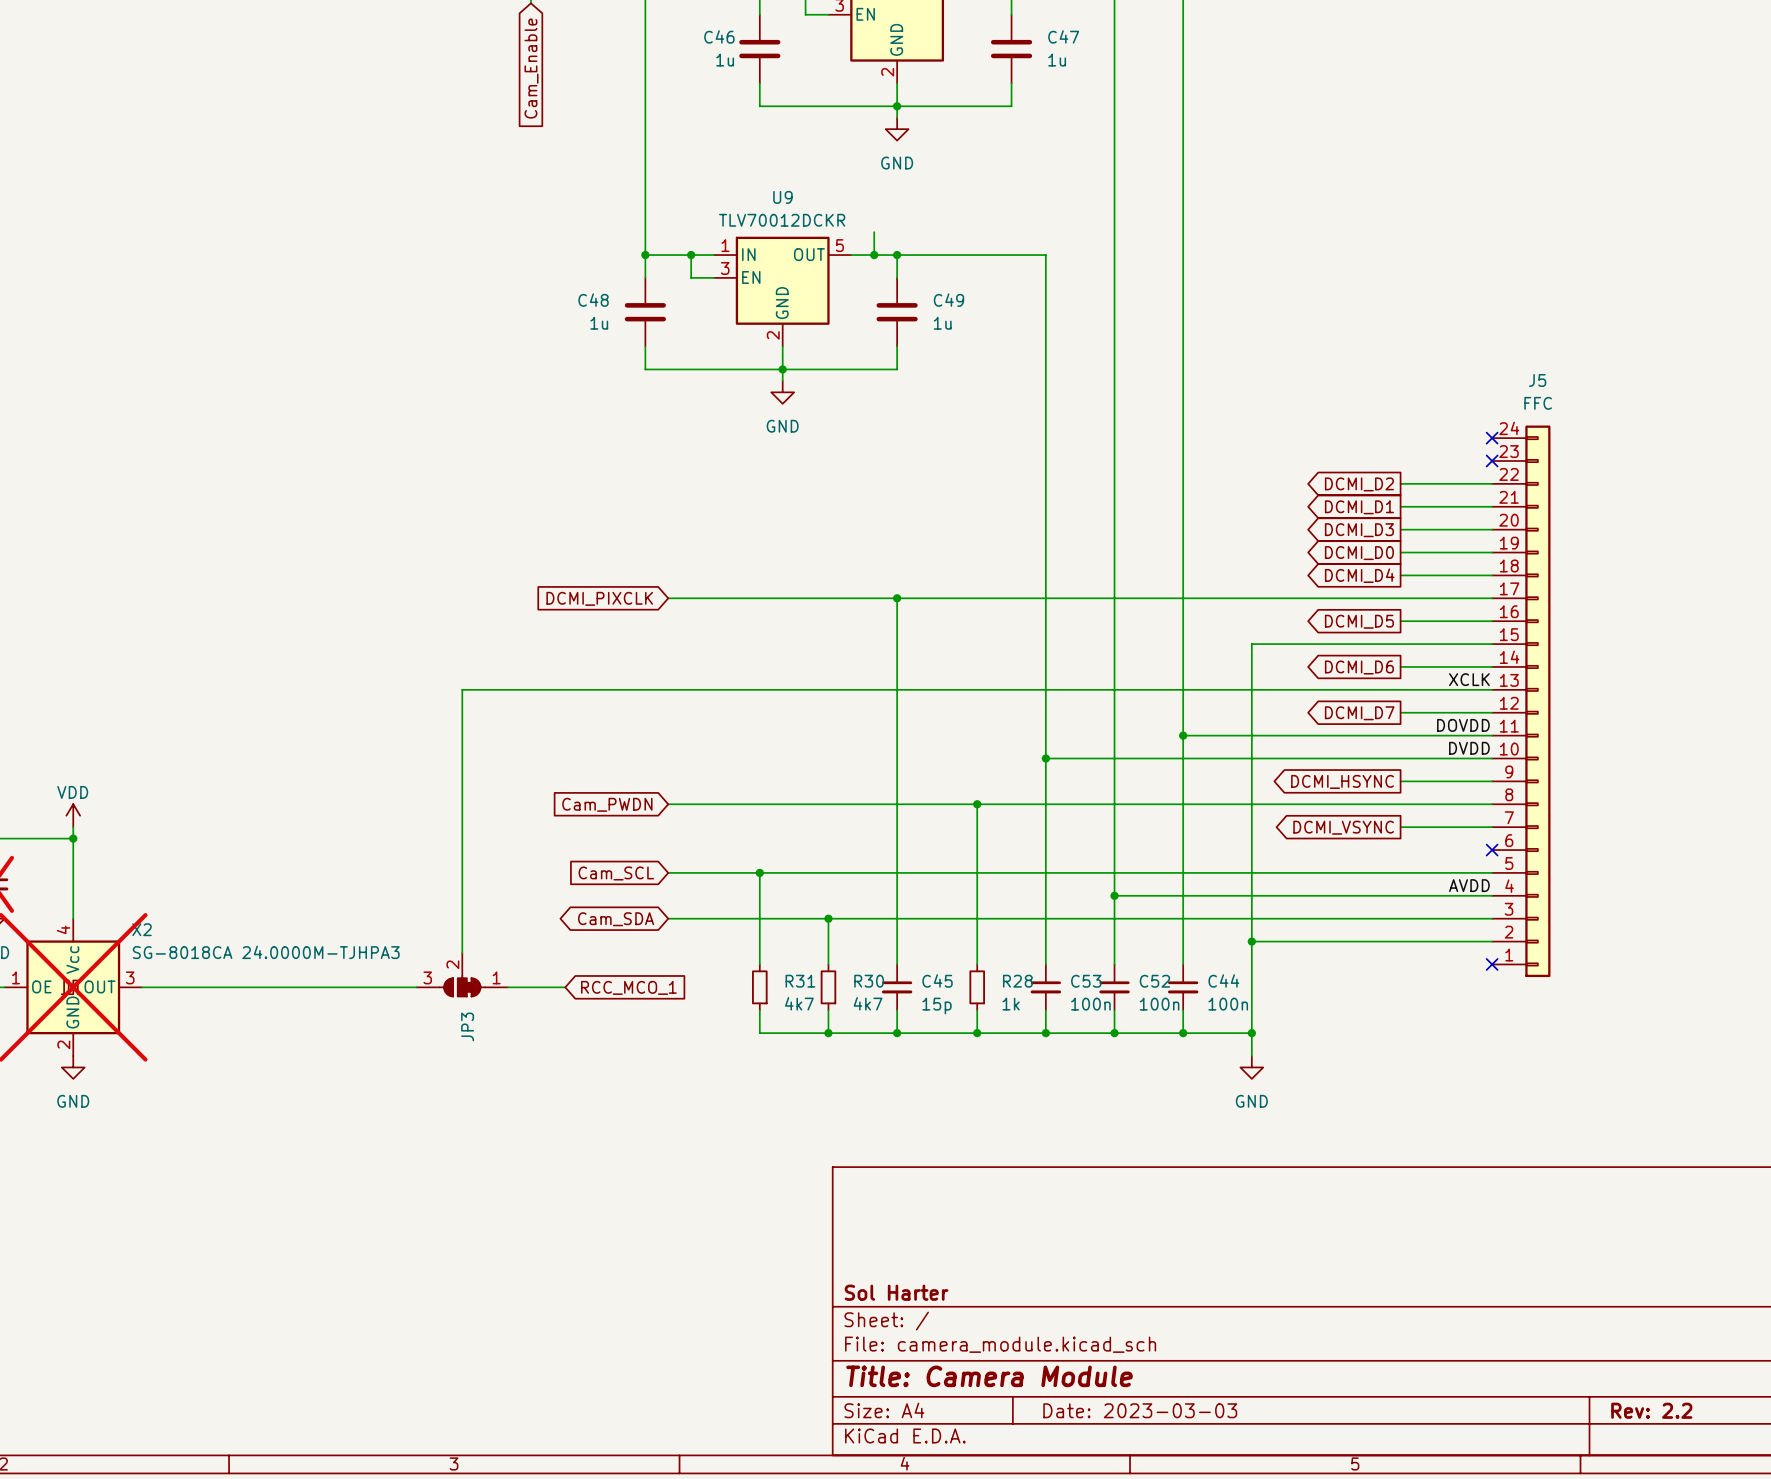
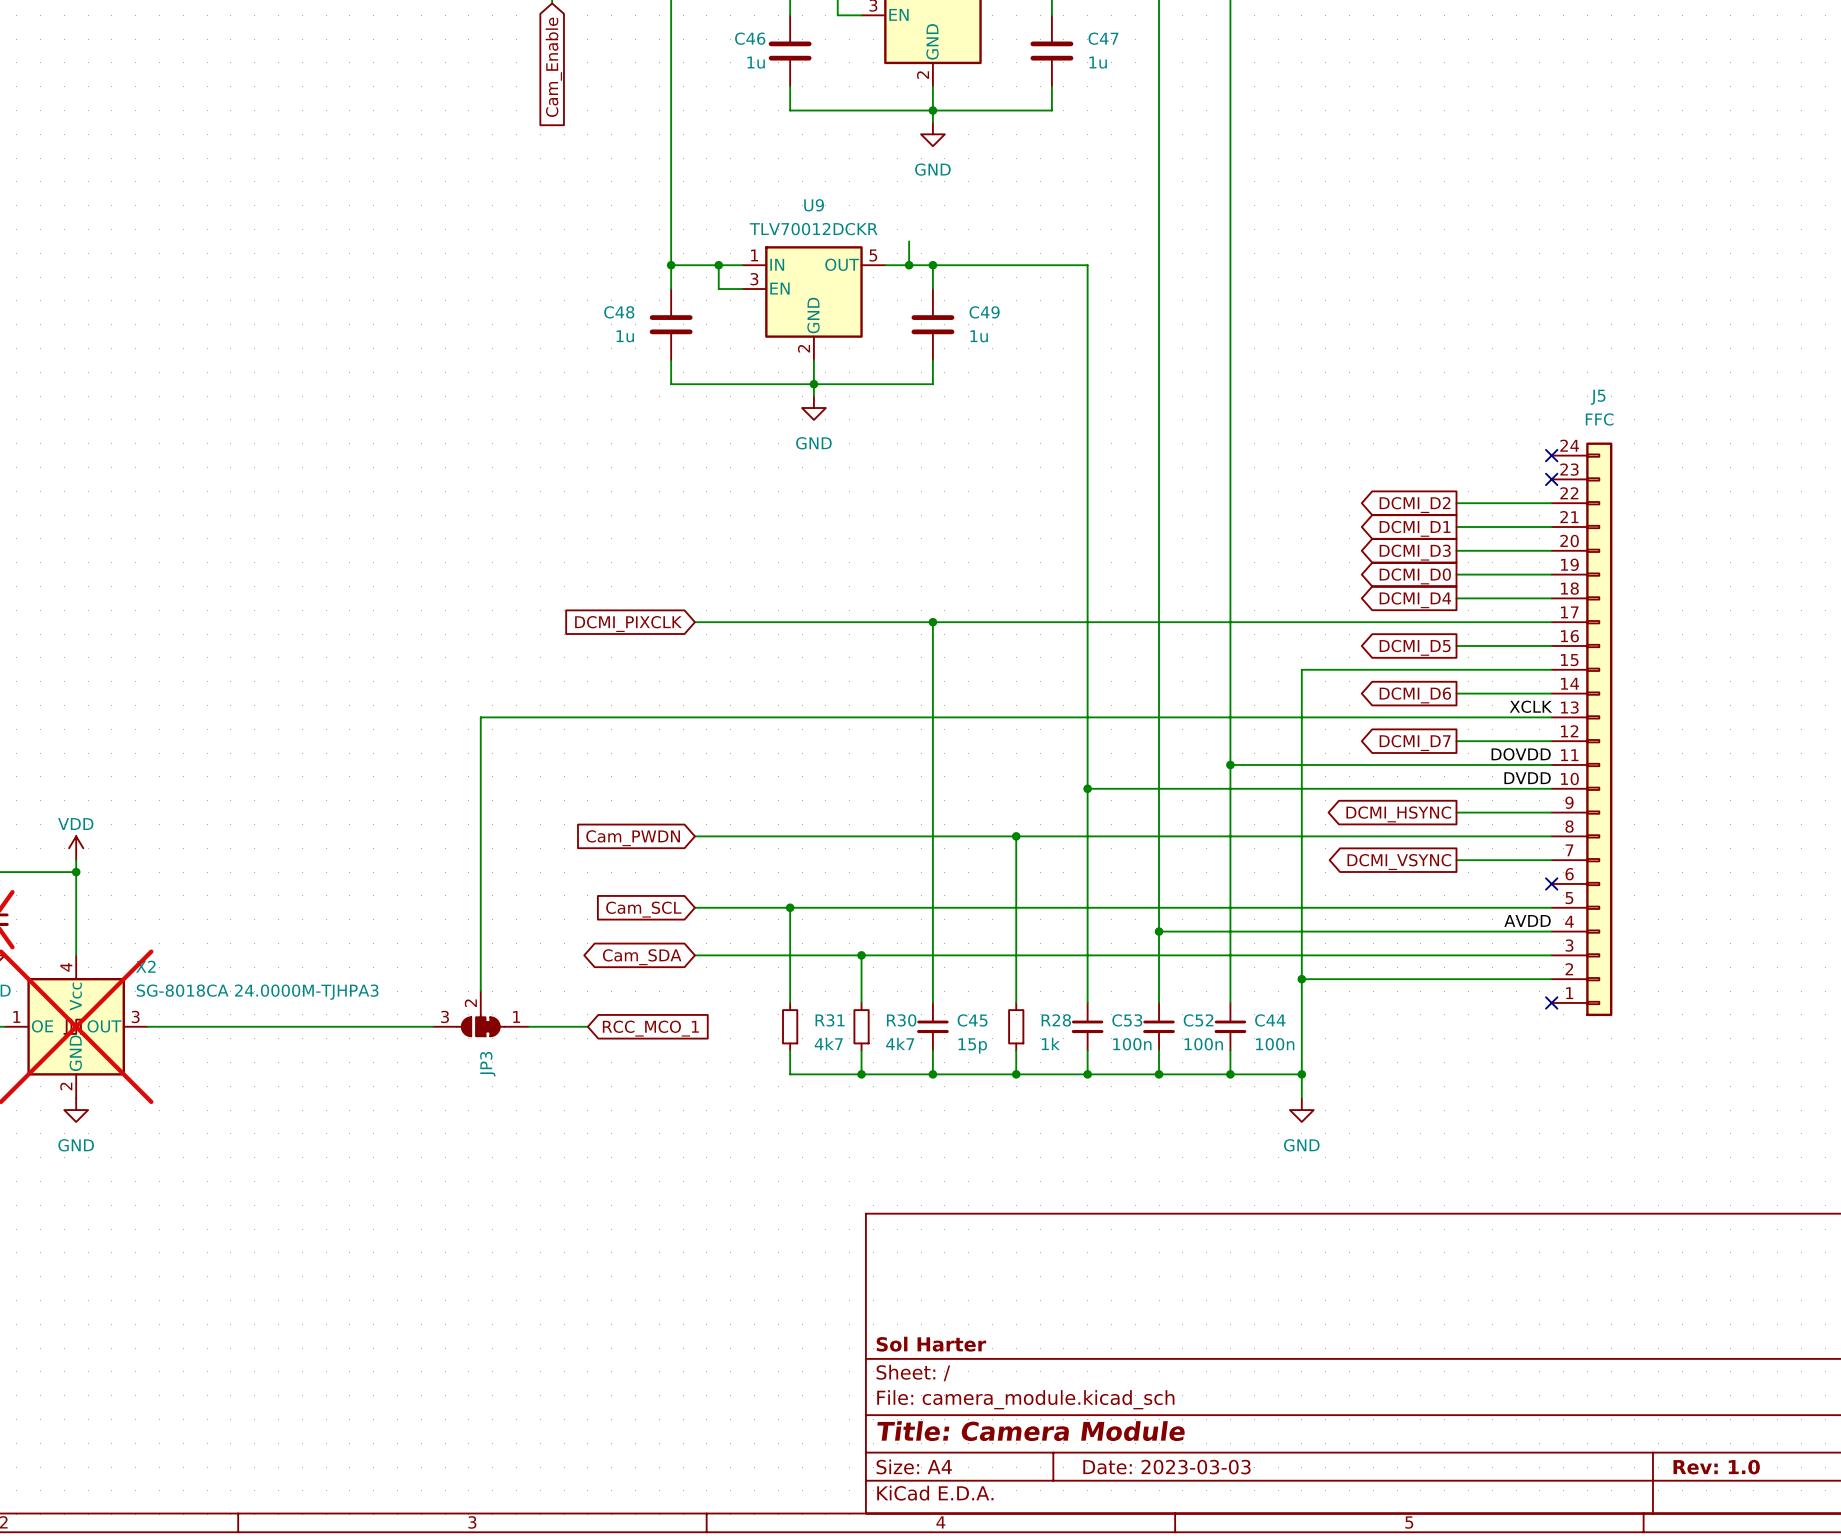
title block: Rev: 2.2 (1651, 1410) -> Rev: 1.0 (1716, 1467)

